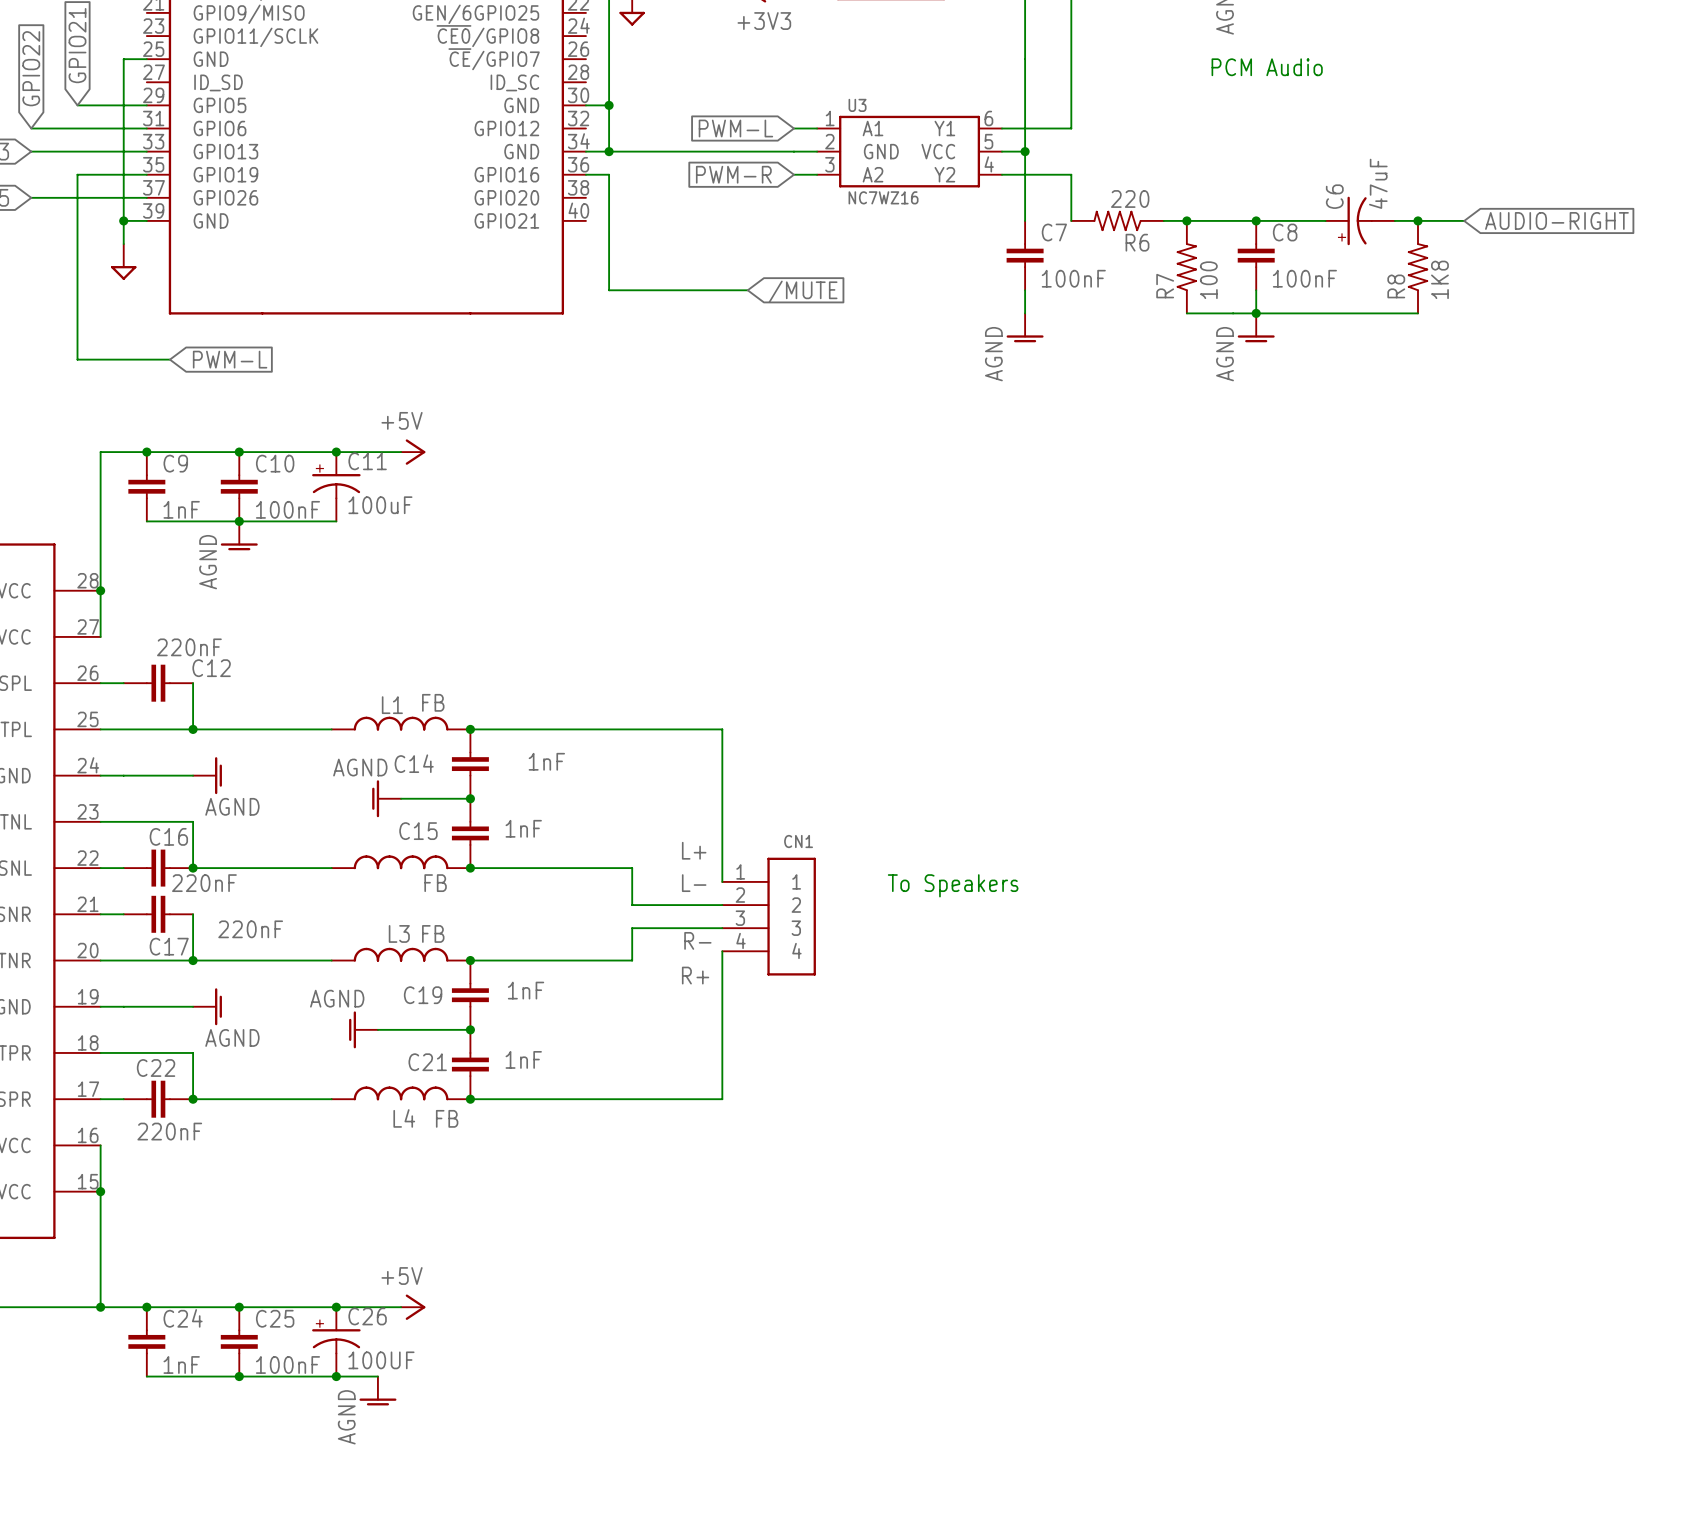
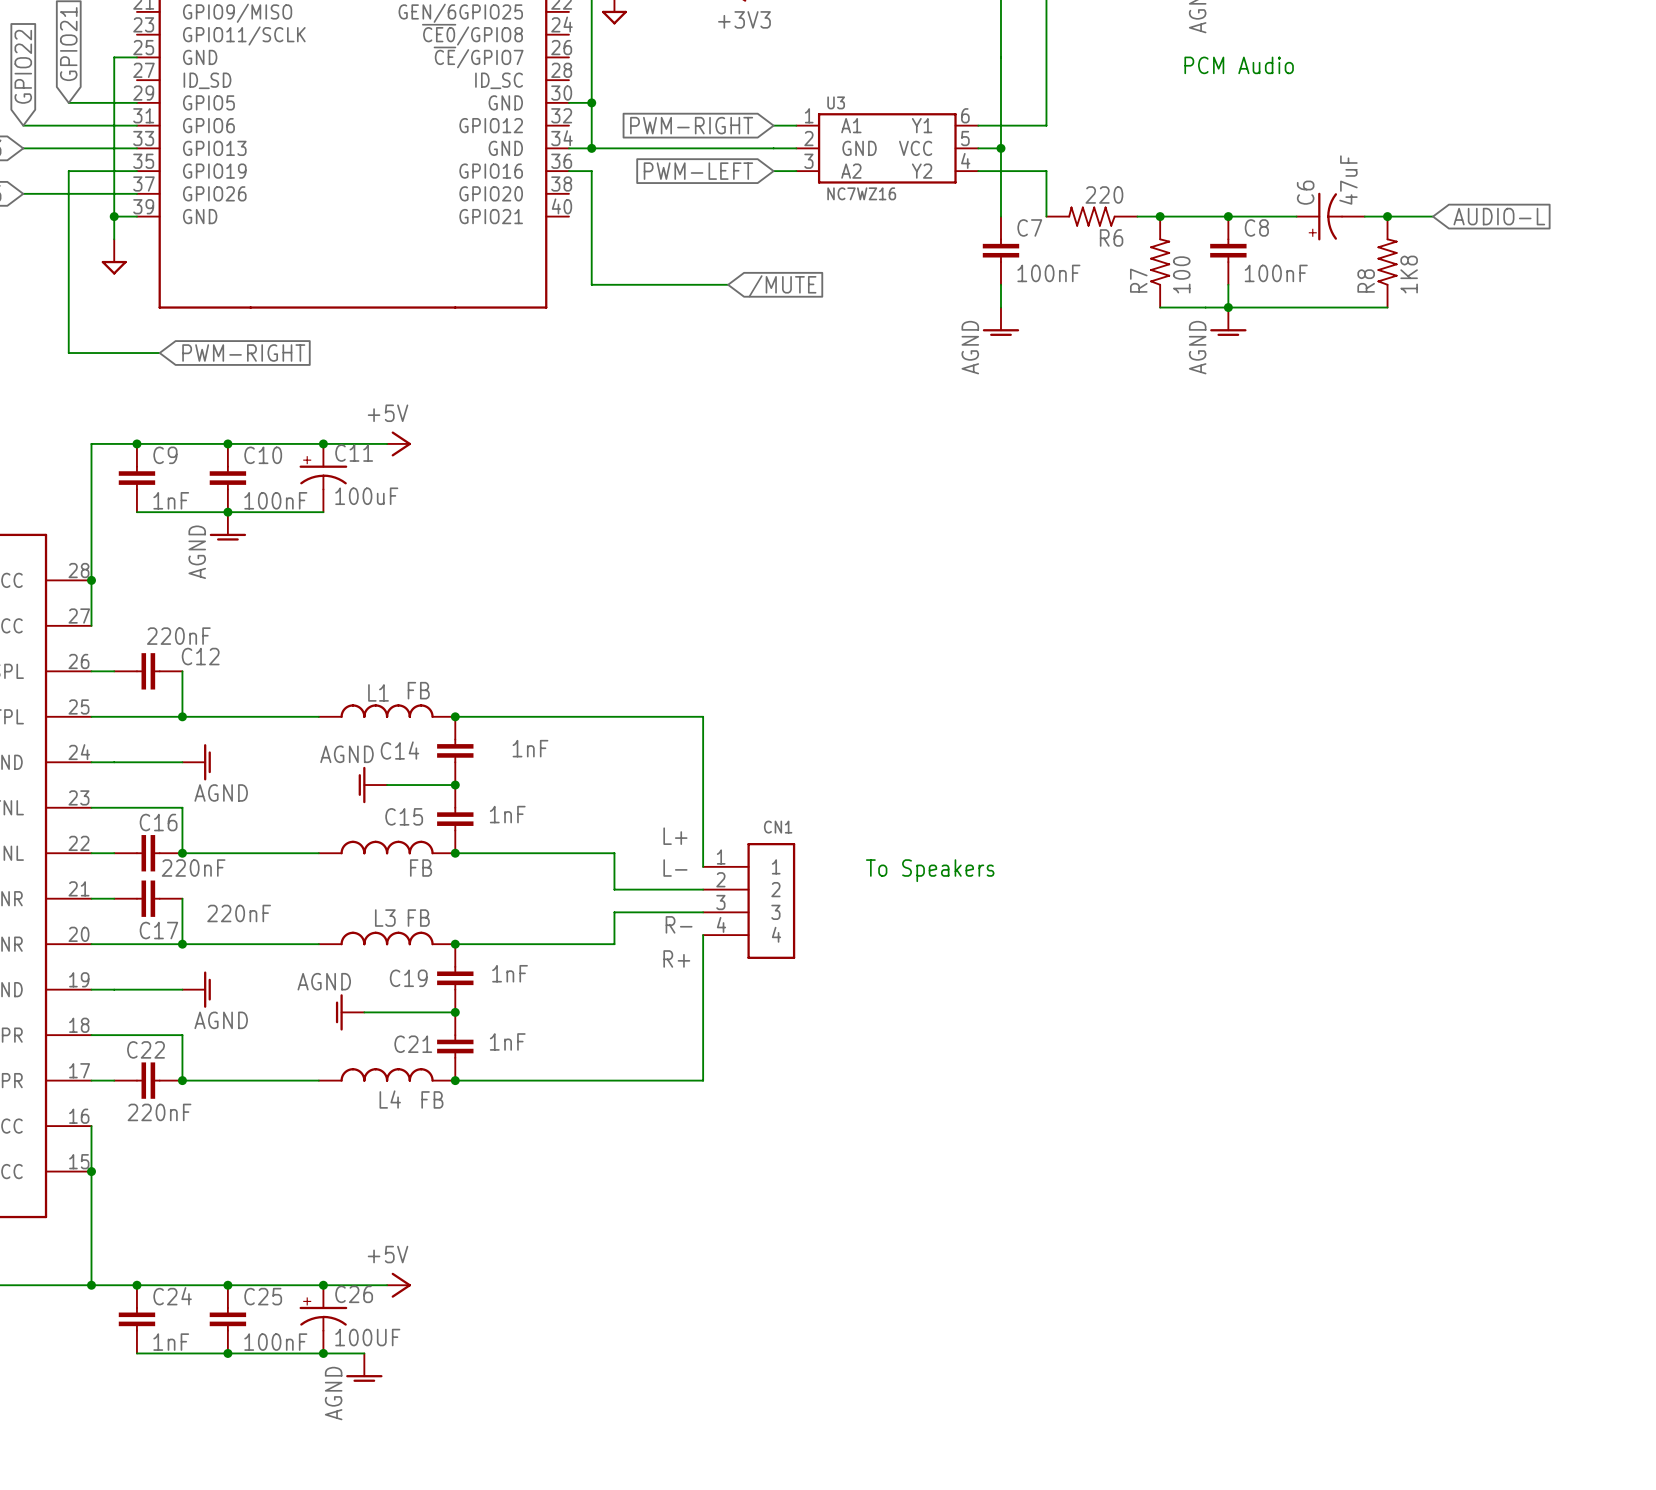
global label: PWM-L (735, 128) -> PWM-RIGHT (691, 125)
global label: PWM-R (733, 174) -> PWM-LEFT (698, 171)
global label: AUDIO-RIGHT (1556, 220) -> AUDIO-L (1499, 216)
global label: PWM-L (230, 359) -> PWM-RIGHT (243, 353)

